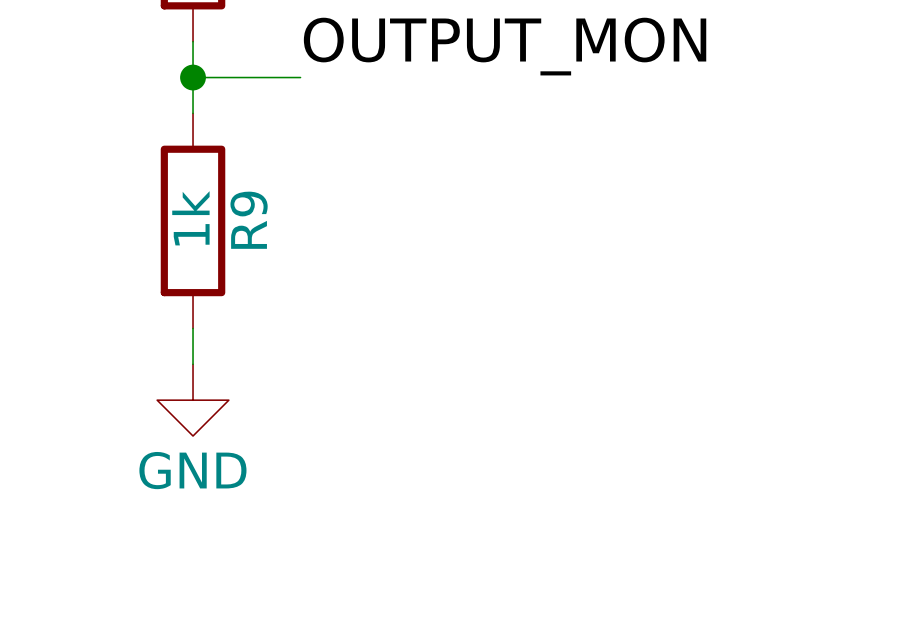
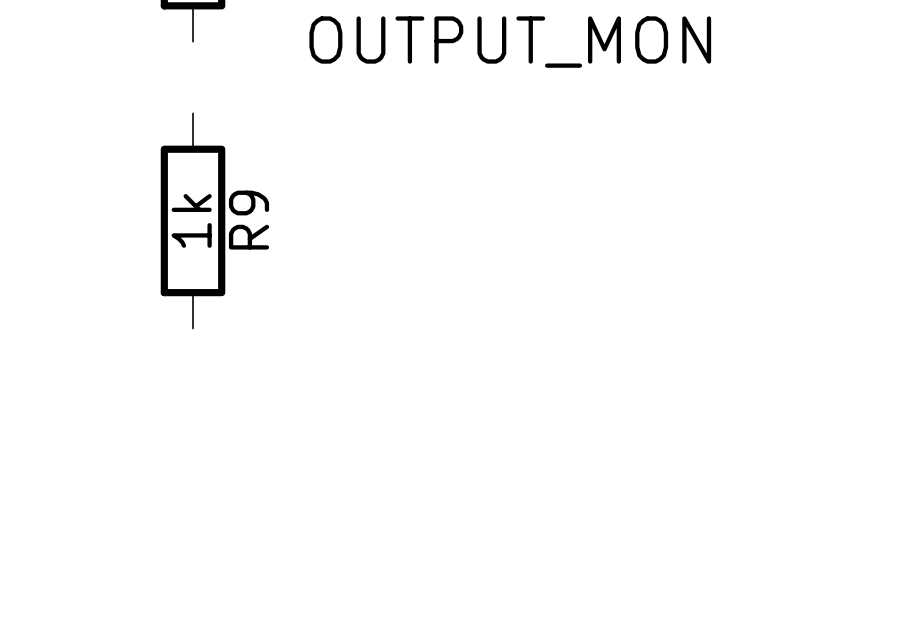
wire: (193, 41) (193, 113) -> none
wire: (193, 77) (300, 77) -> none
junction: (193, 77) -> none
wire: (193, 328) (193, 364) -> none
power symbol: GND (193, 400) -> none

